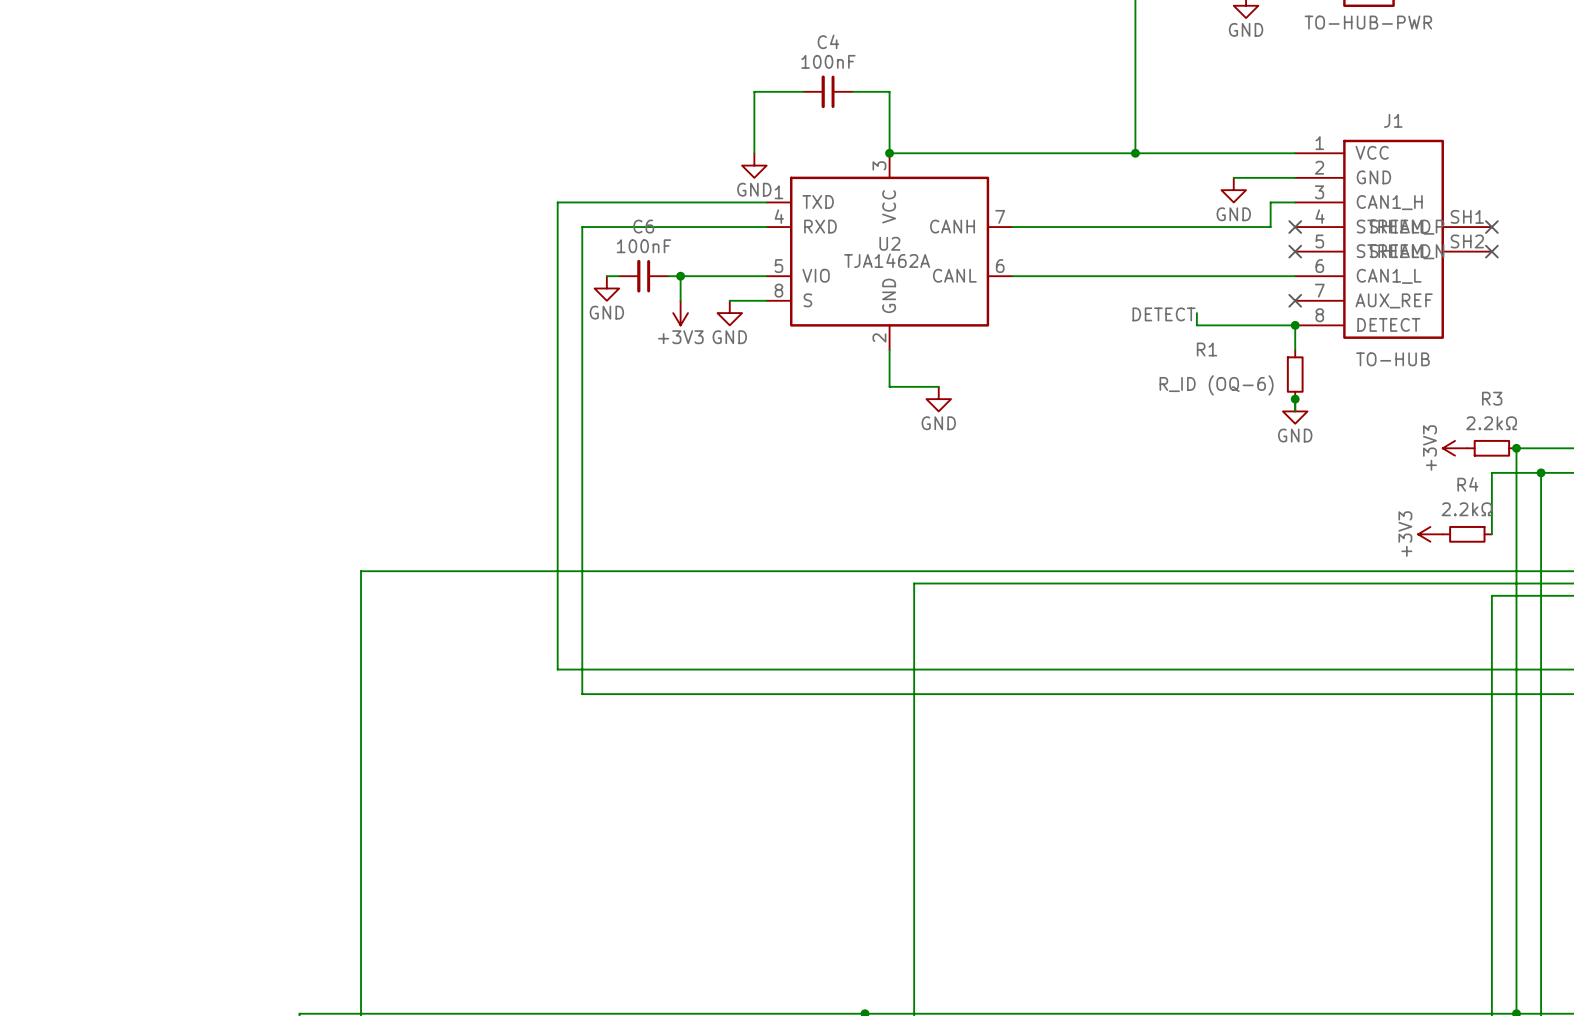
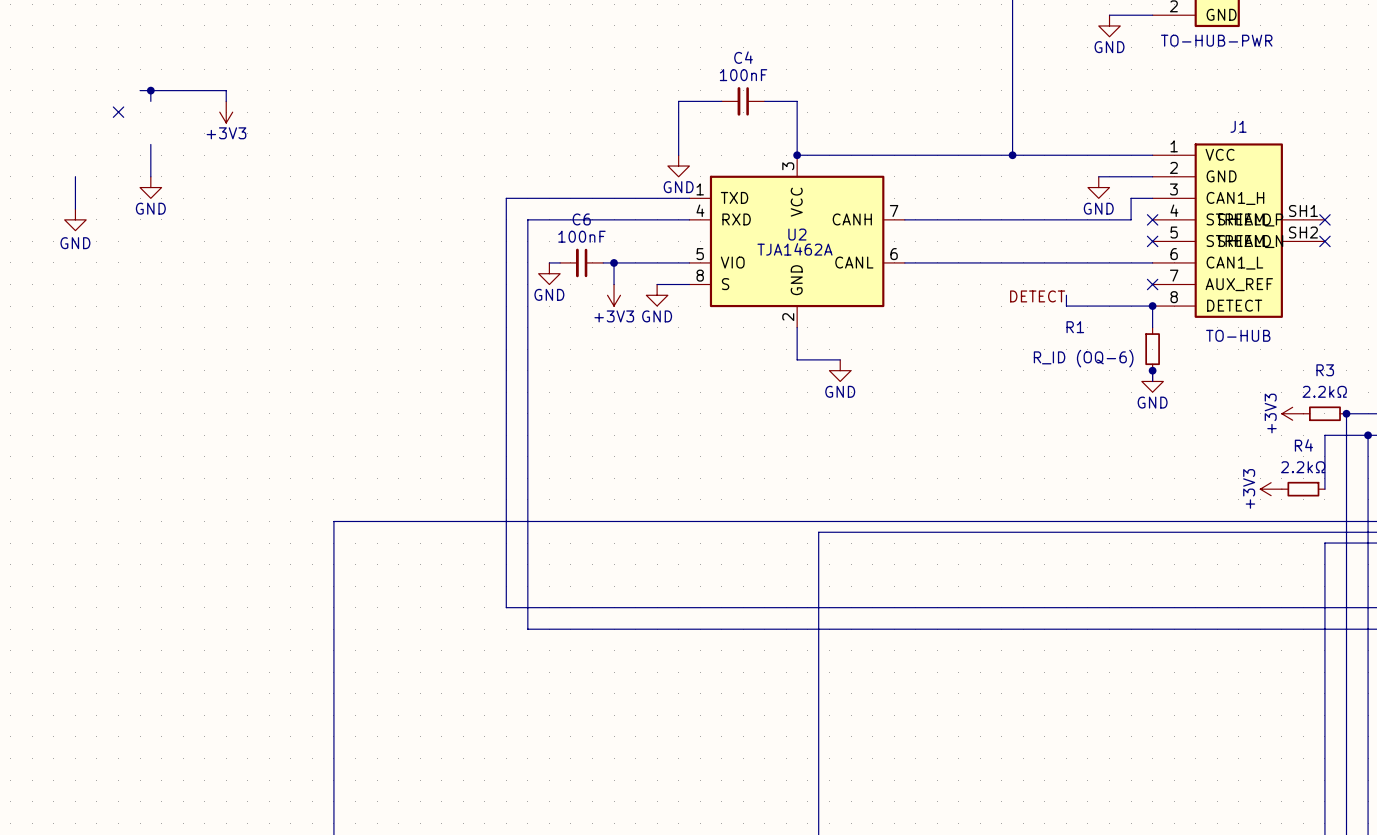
wire: none -> (140, 90) (226, 90) (226, 101)
wire: none -> (150, 90) (150, 101)
junction: none -> (150, 90)
no-connect mark: none -> (118, 112)
power symbol: none -> +3V3 (226, 112)
wire: none -> (150, 144) (150, 176)
wire: none -> (75, 176) (75, 209)
power symbol: none -> GND (150, 187)
power symbol: none -> GND (75, 219)

